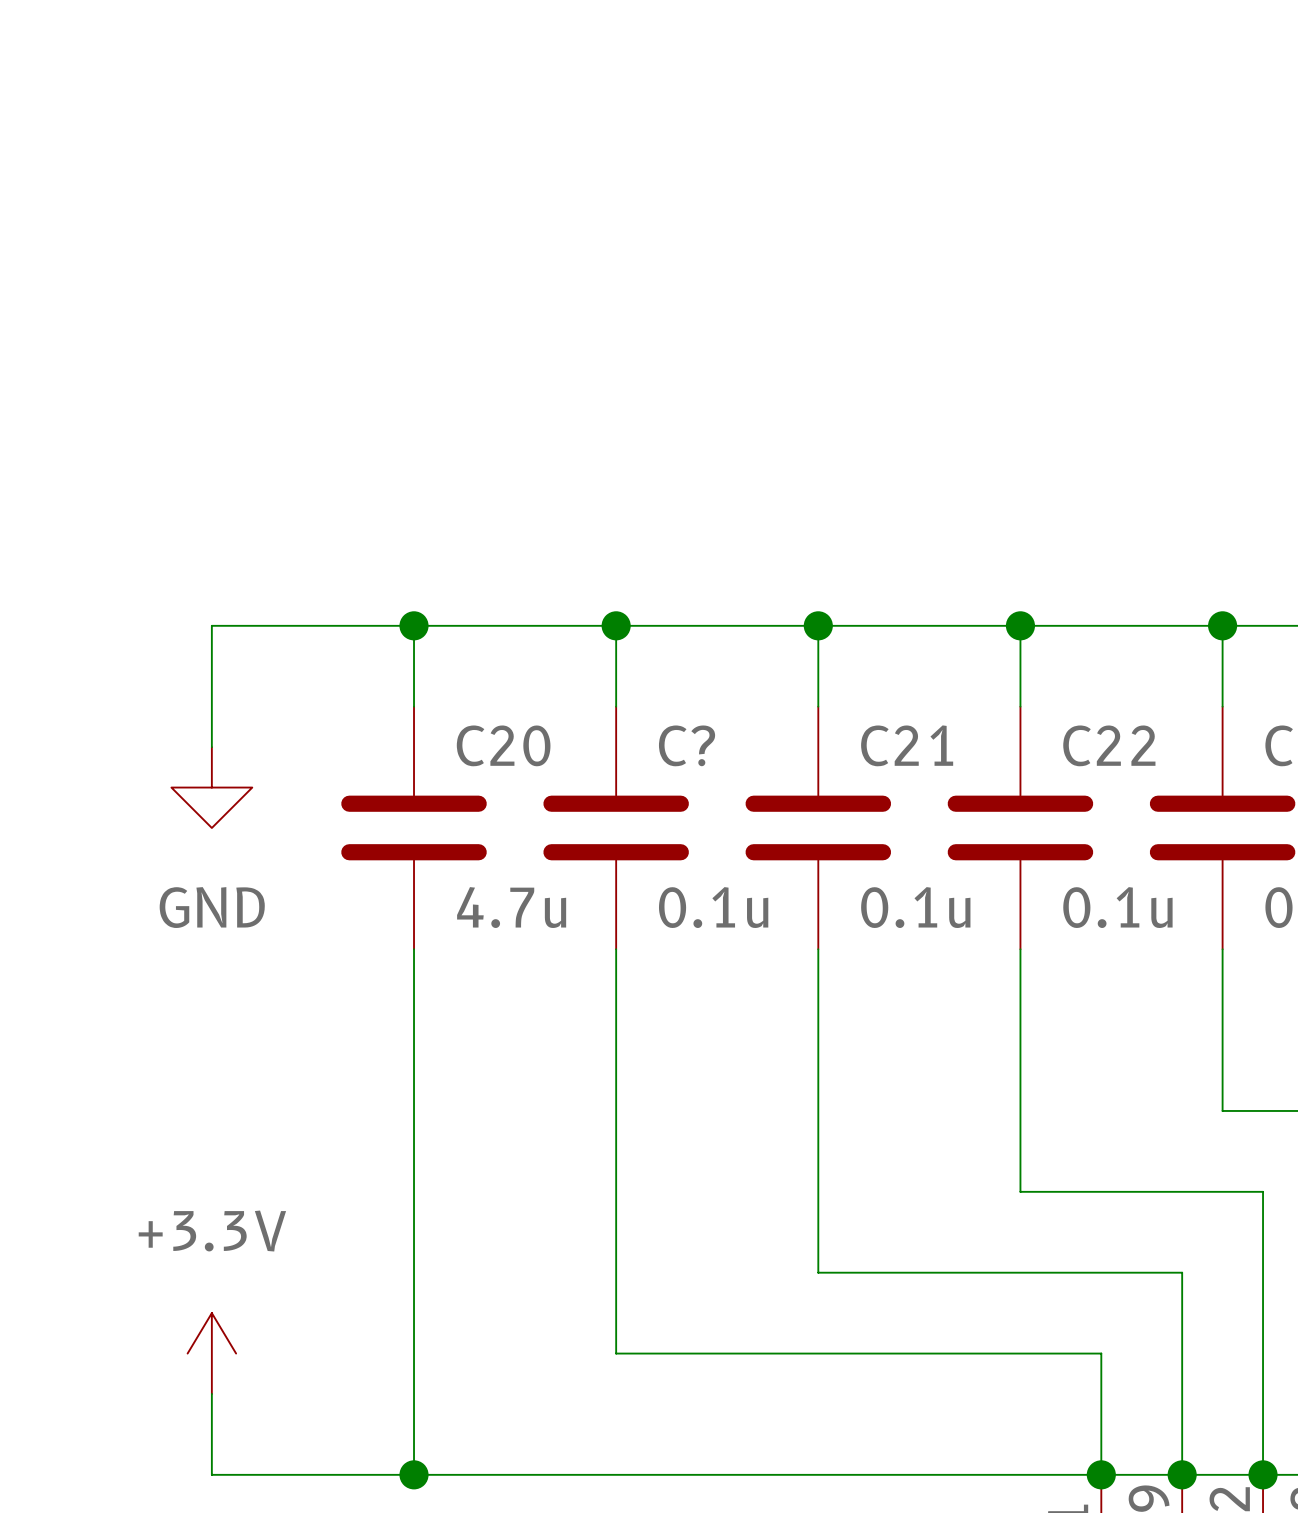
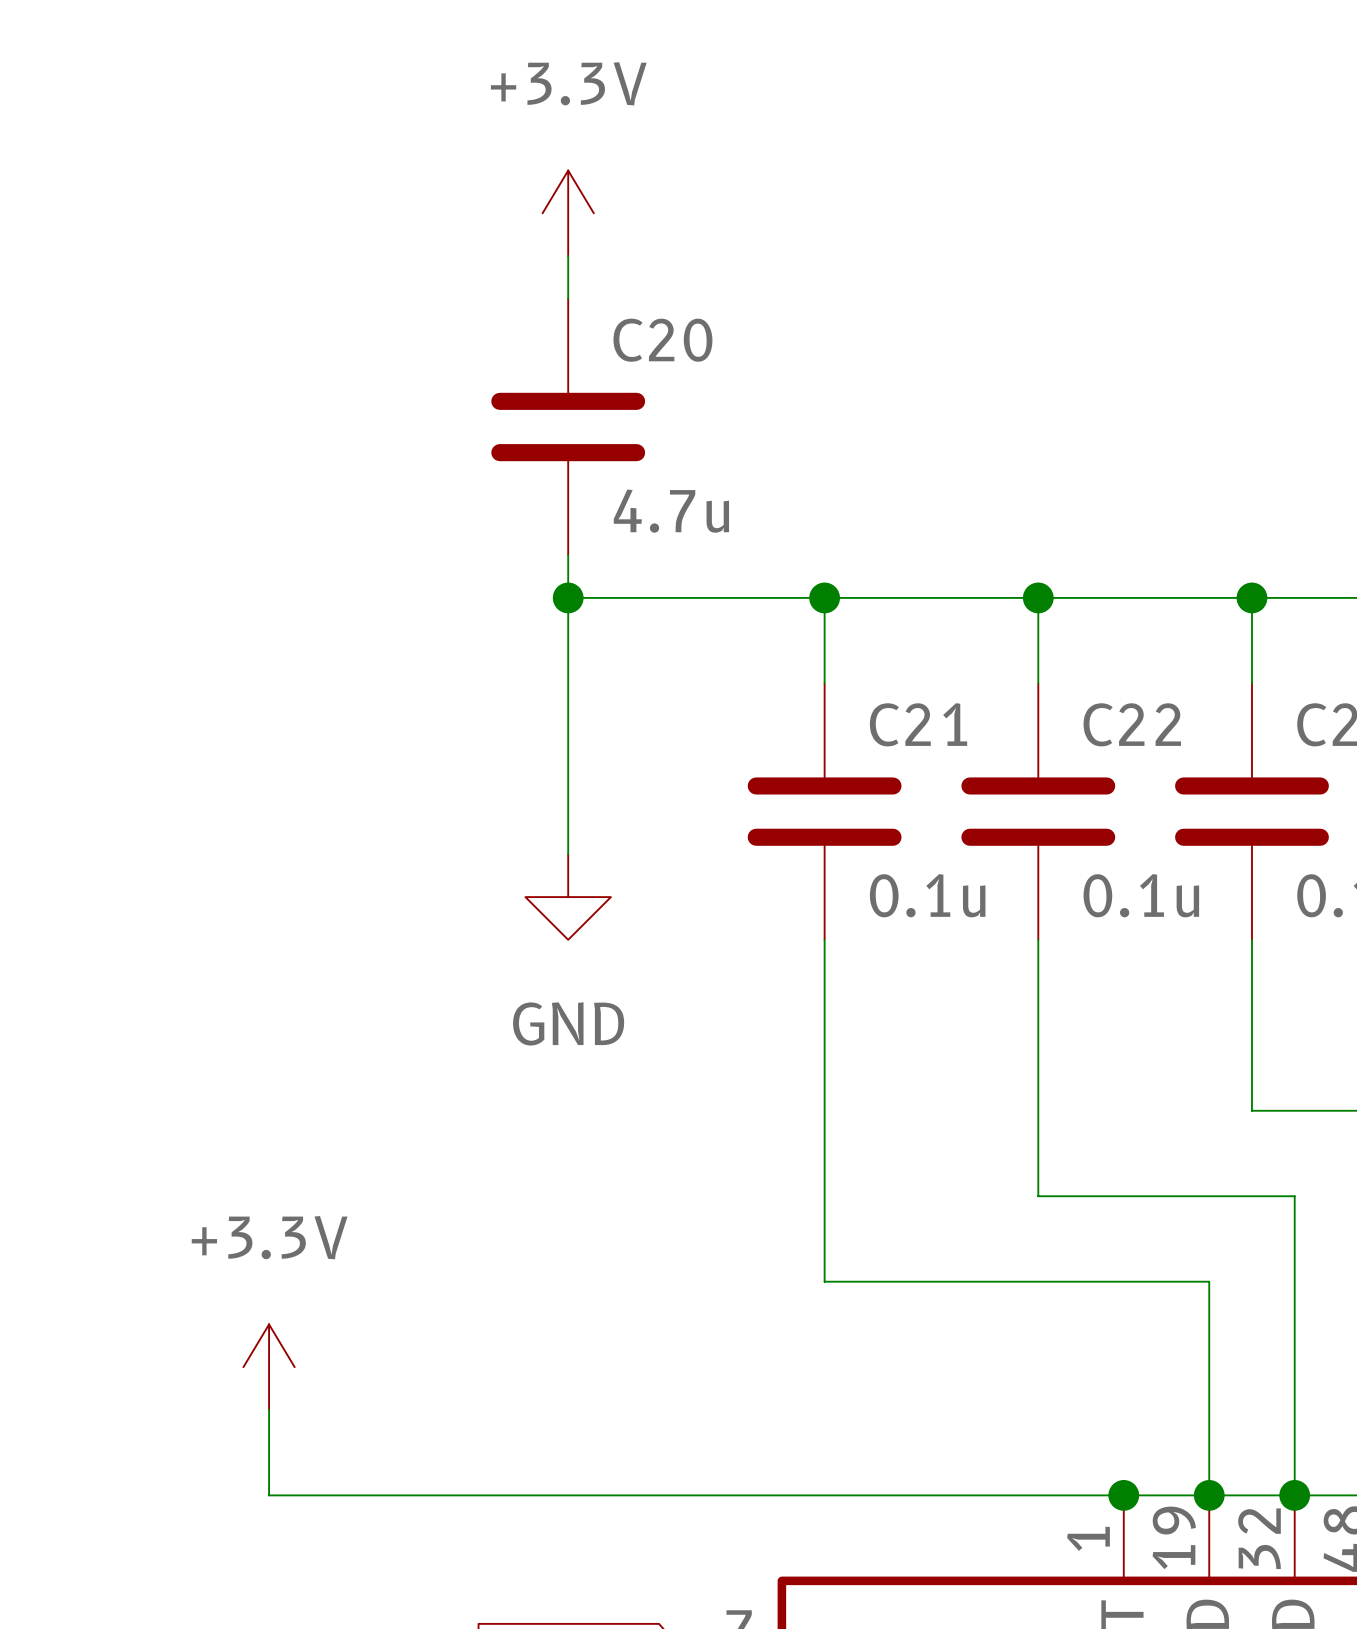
power symbol: none -> +3.3V (568, 213)
wire: none -> (568, 256) (568, 298)
wire: none -> (568, 555) (568, 854)
wire: (414, 625) (414, 706) -> none
junction: (414, 625) -> none
wire: (575, 625) (211, 625) (211, 747) -> none
wire: (616, 625) (616, 706) -> none
junction position: (616, 625) -> (568, 597)
power symbol position: GND (211, 787) -> GND (568, 897)
C20 position: (414, 827) -> (568, 427)
C?: 0.1u (616, 827) -> none
wire: (414, 949) (414, 1474) -> none
wire: (616, 949) (616, 1353) (1101, 1353) (1101, 1474) -> none
power symbol position: +3.3V (211, 1353) -> +3.3V (269, 1367)
wire: (211, 1393) (211, 1474) (292, 1474) -> (269, 1409) (269, 1495)
junction: (414, 1474) -> none

